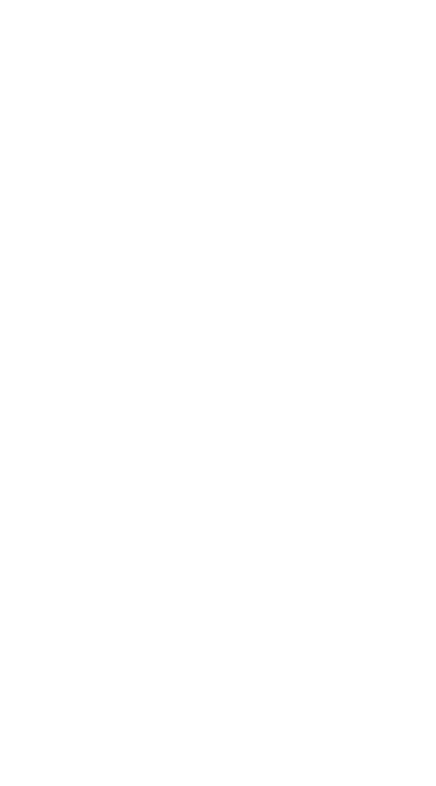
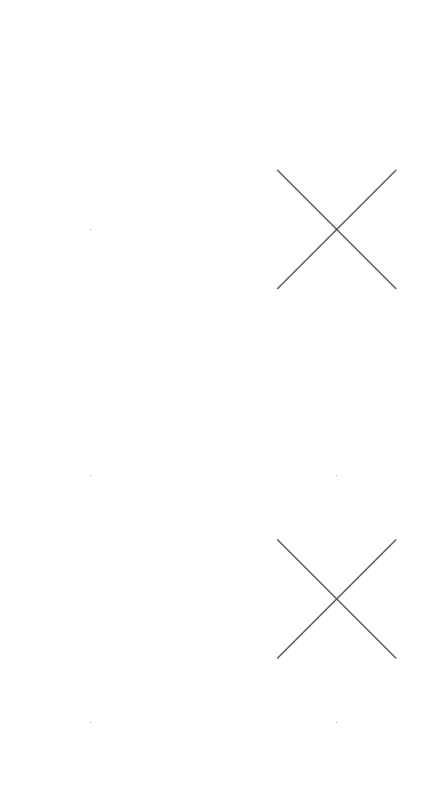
no-connect mark: none -> (336, 229)
no-connect mark: none -> (336, 598)

